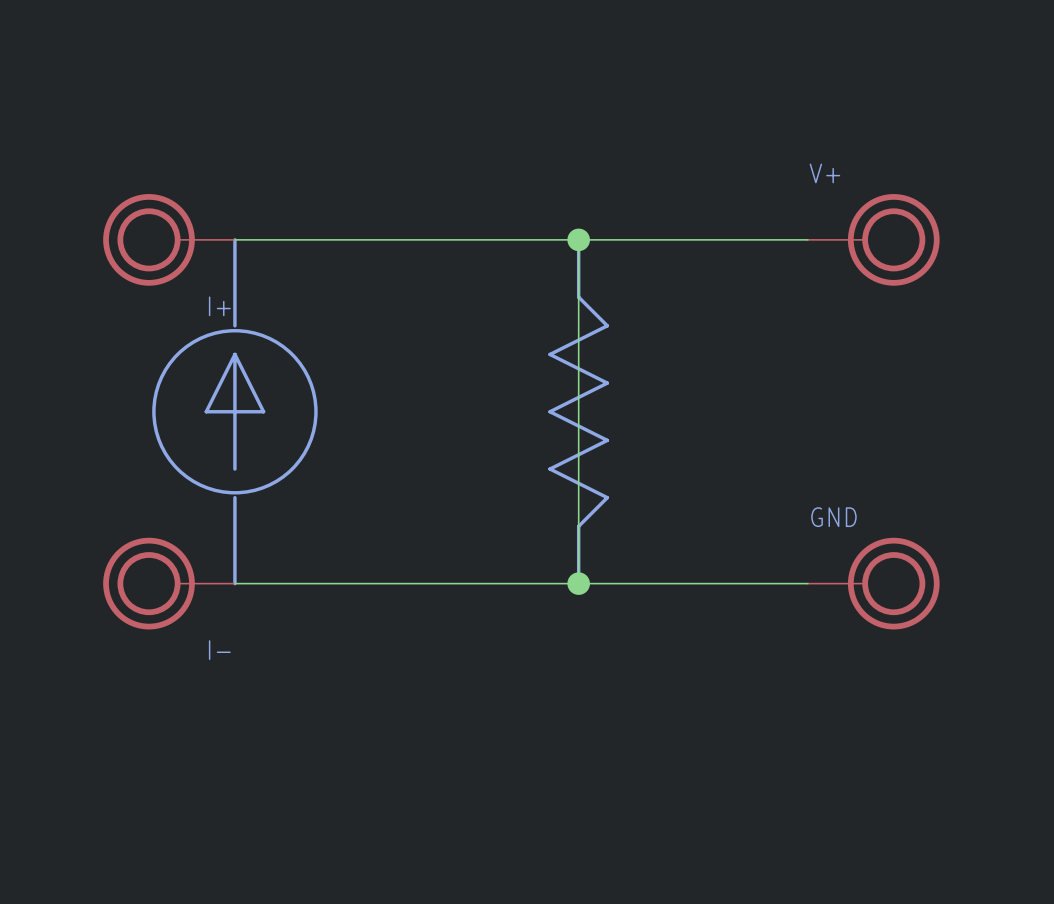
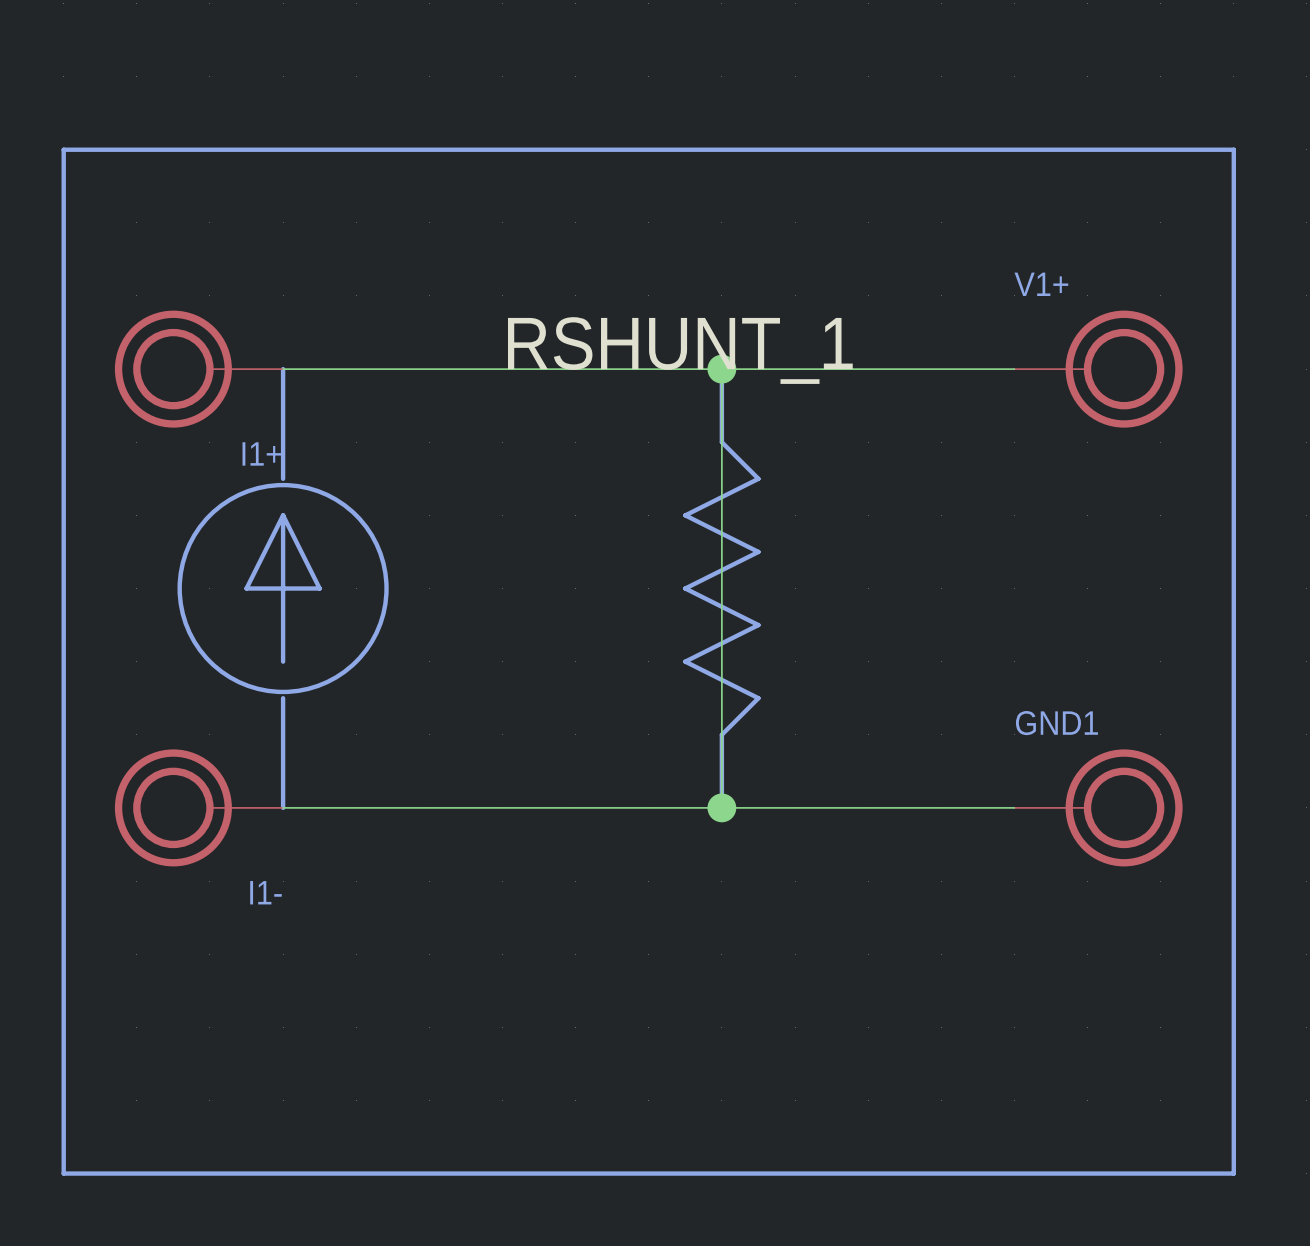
line: none -> (63, 149) (1233, 149) (1233, 1173) (63, 1173) (63, 149)
part value: V+ (824, 173) -> V1+ (1041, 284)
label: none -> RSHUNT_1 (680, 350)
part value: I+ (219, 306) -> I1+ (262, 453)
part value: GND (833, 517) -> GND1 (1056, 723)
part value: I- (219, 650) -> I1- (265, 892)

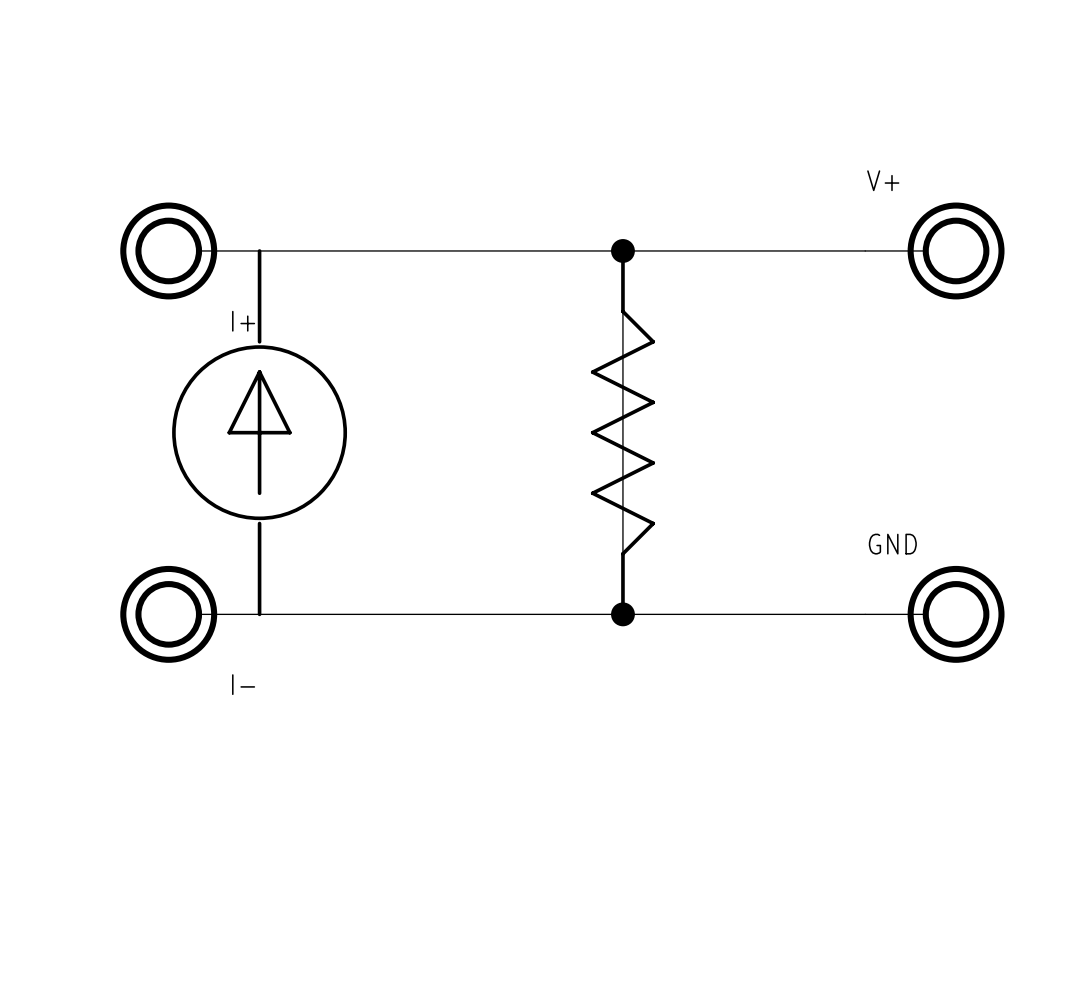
line: (63, 149) (1233, 149) (1233, 1173) (63, 1173) (63, 149) -> none
part value: V1+ (1041, 284) -> V+ (883, 180)
label: RSHUNT_1 (680, 350) -> none
part value: I1+ (262, 453) -> I+ (243, 321)
part value: GND1 (1056, 723) -> GND (892, 544)
part value: I1- (265, 892) -> I- (243, 684)

